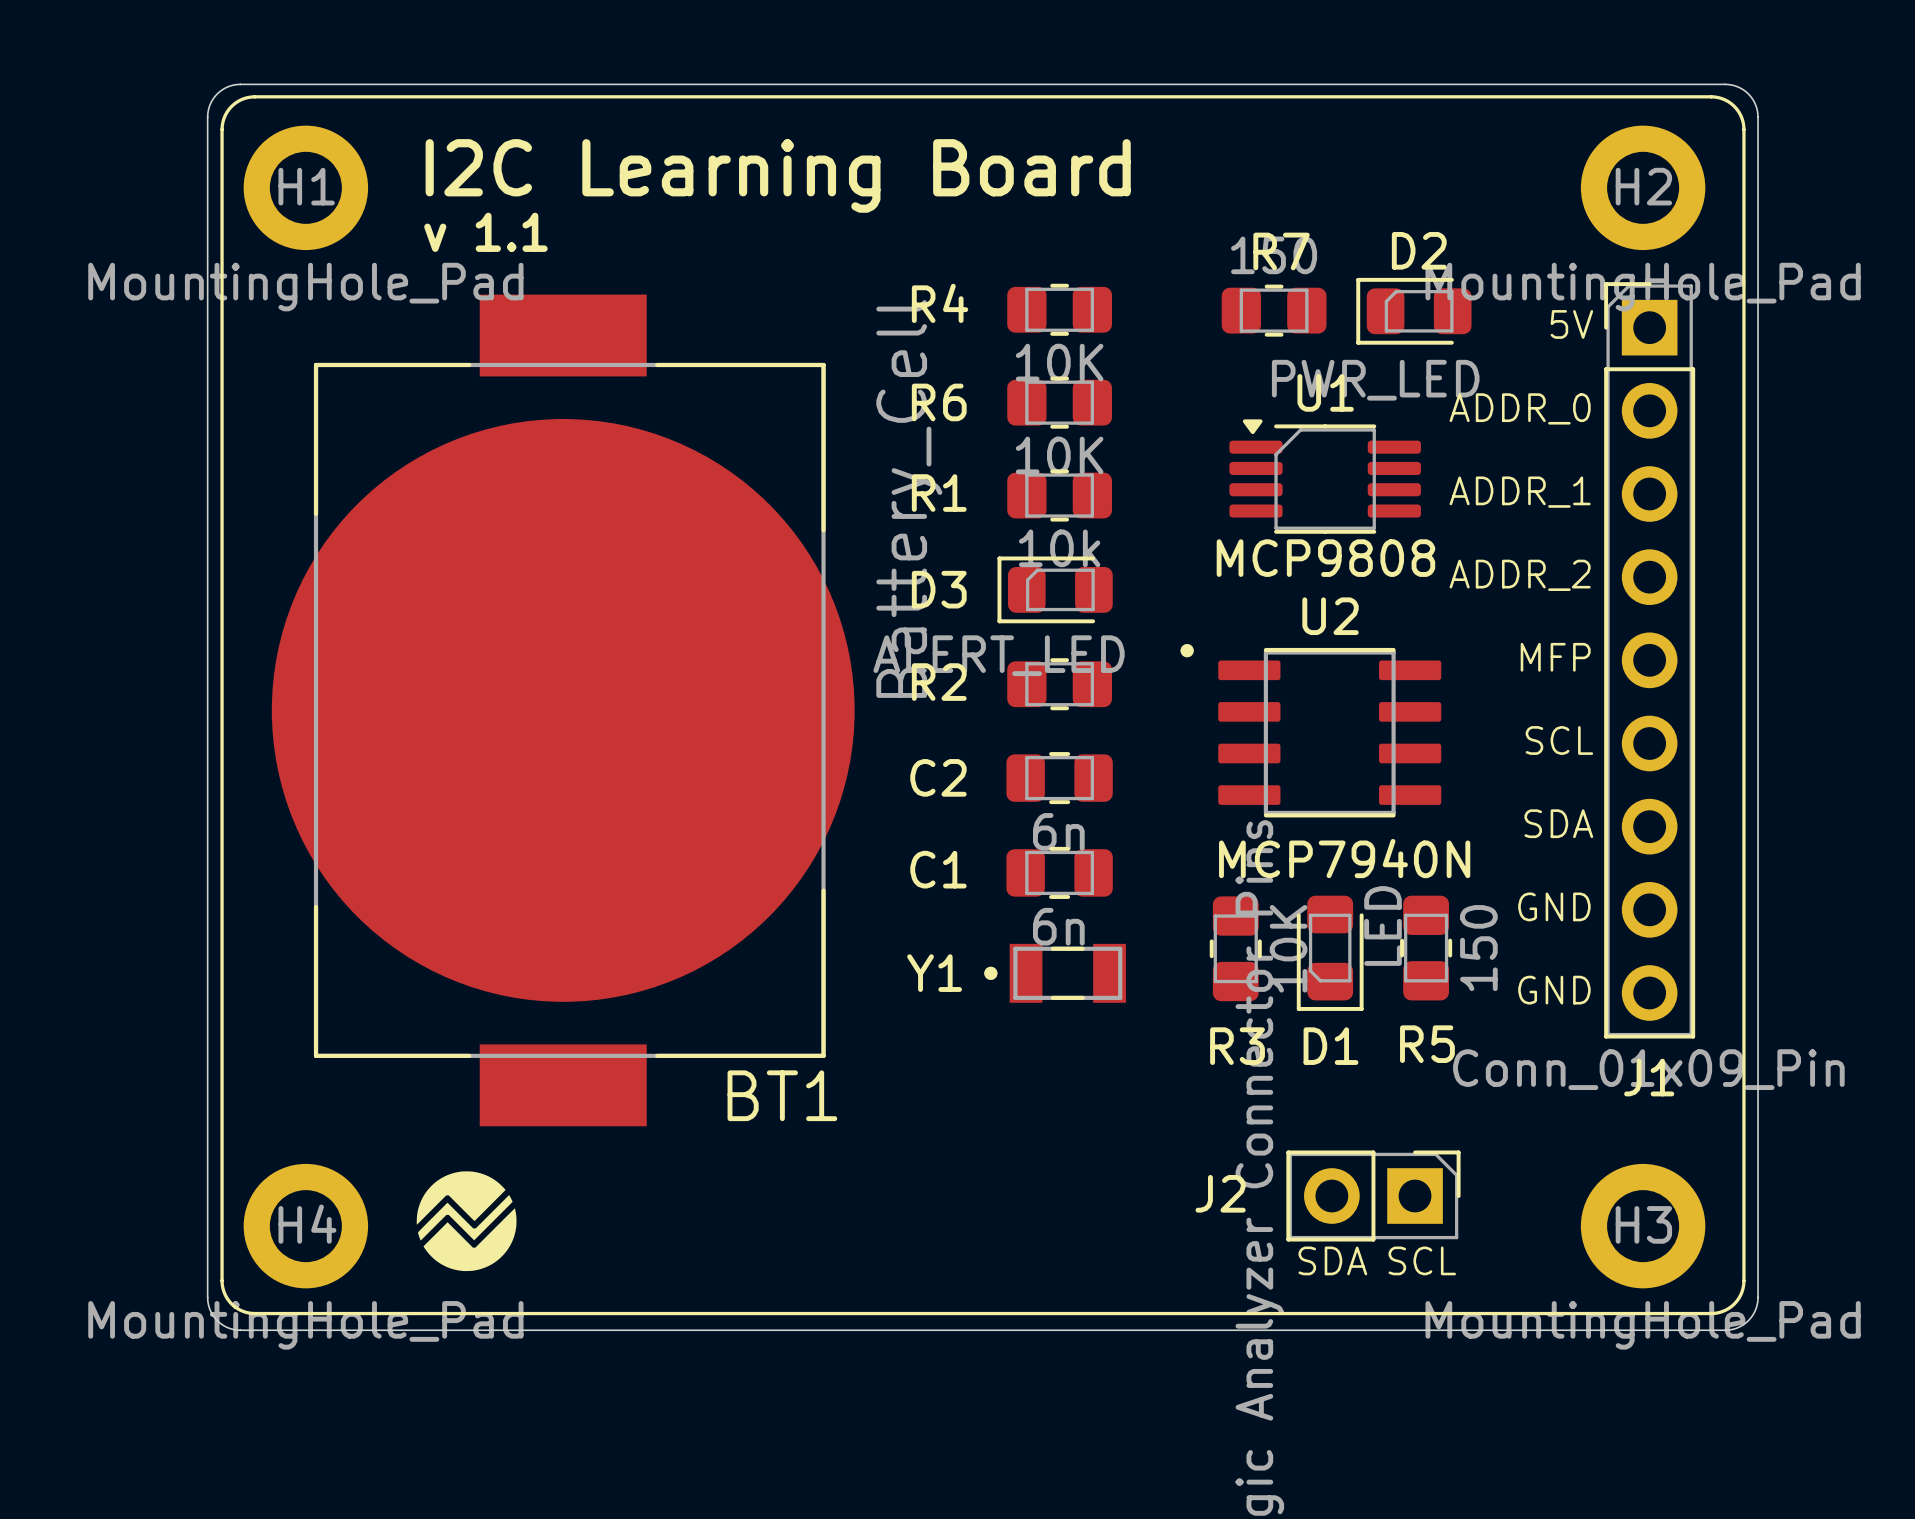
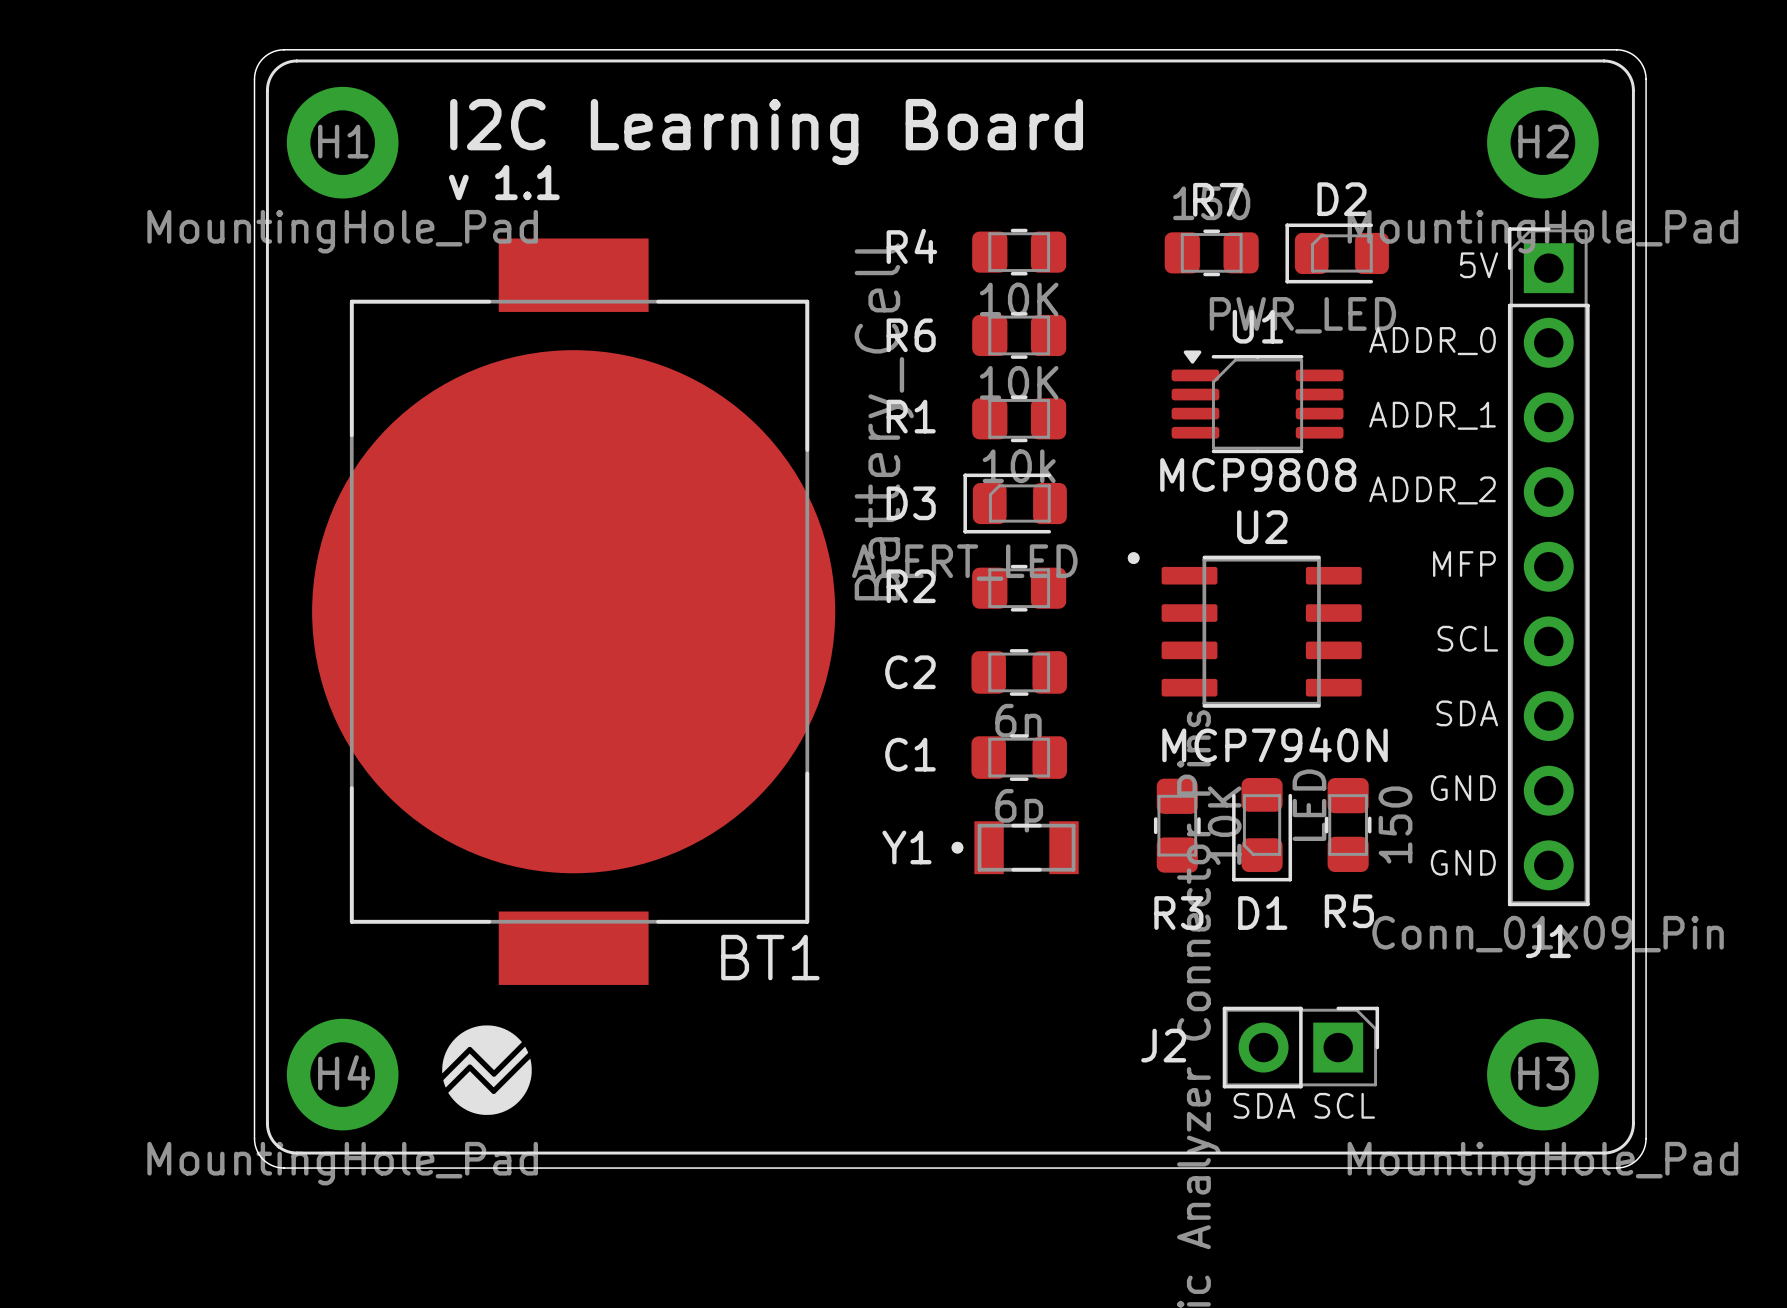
C1 value: 6n (1058, 926) -> 6p (1019, 810)

